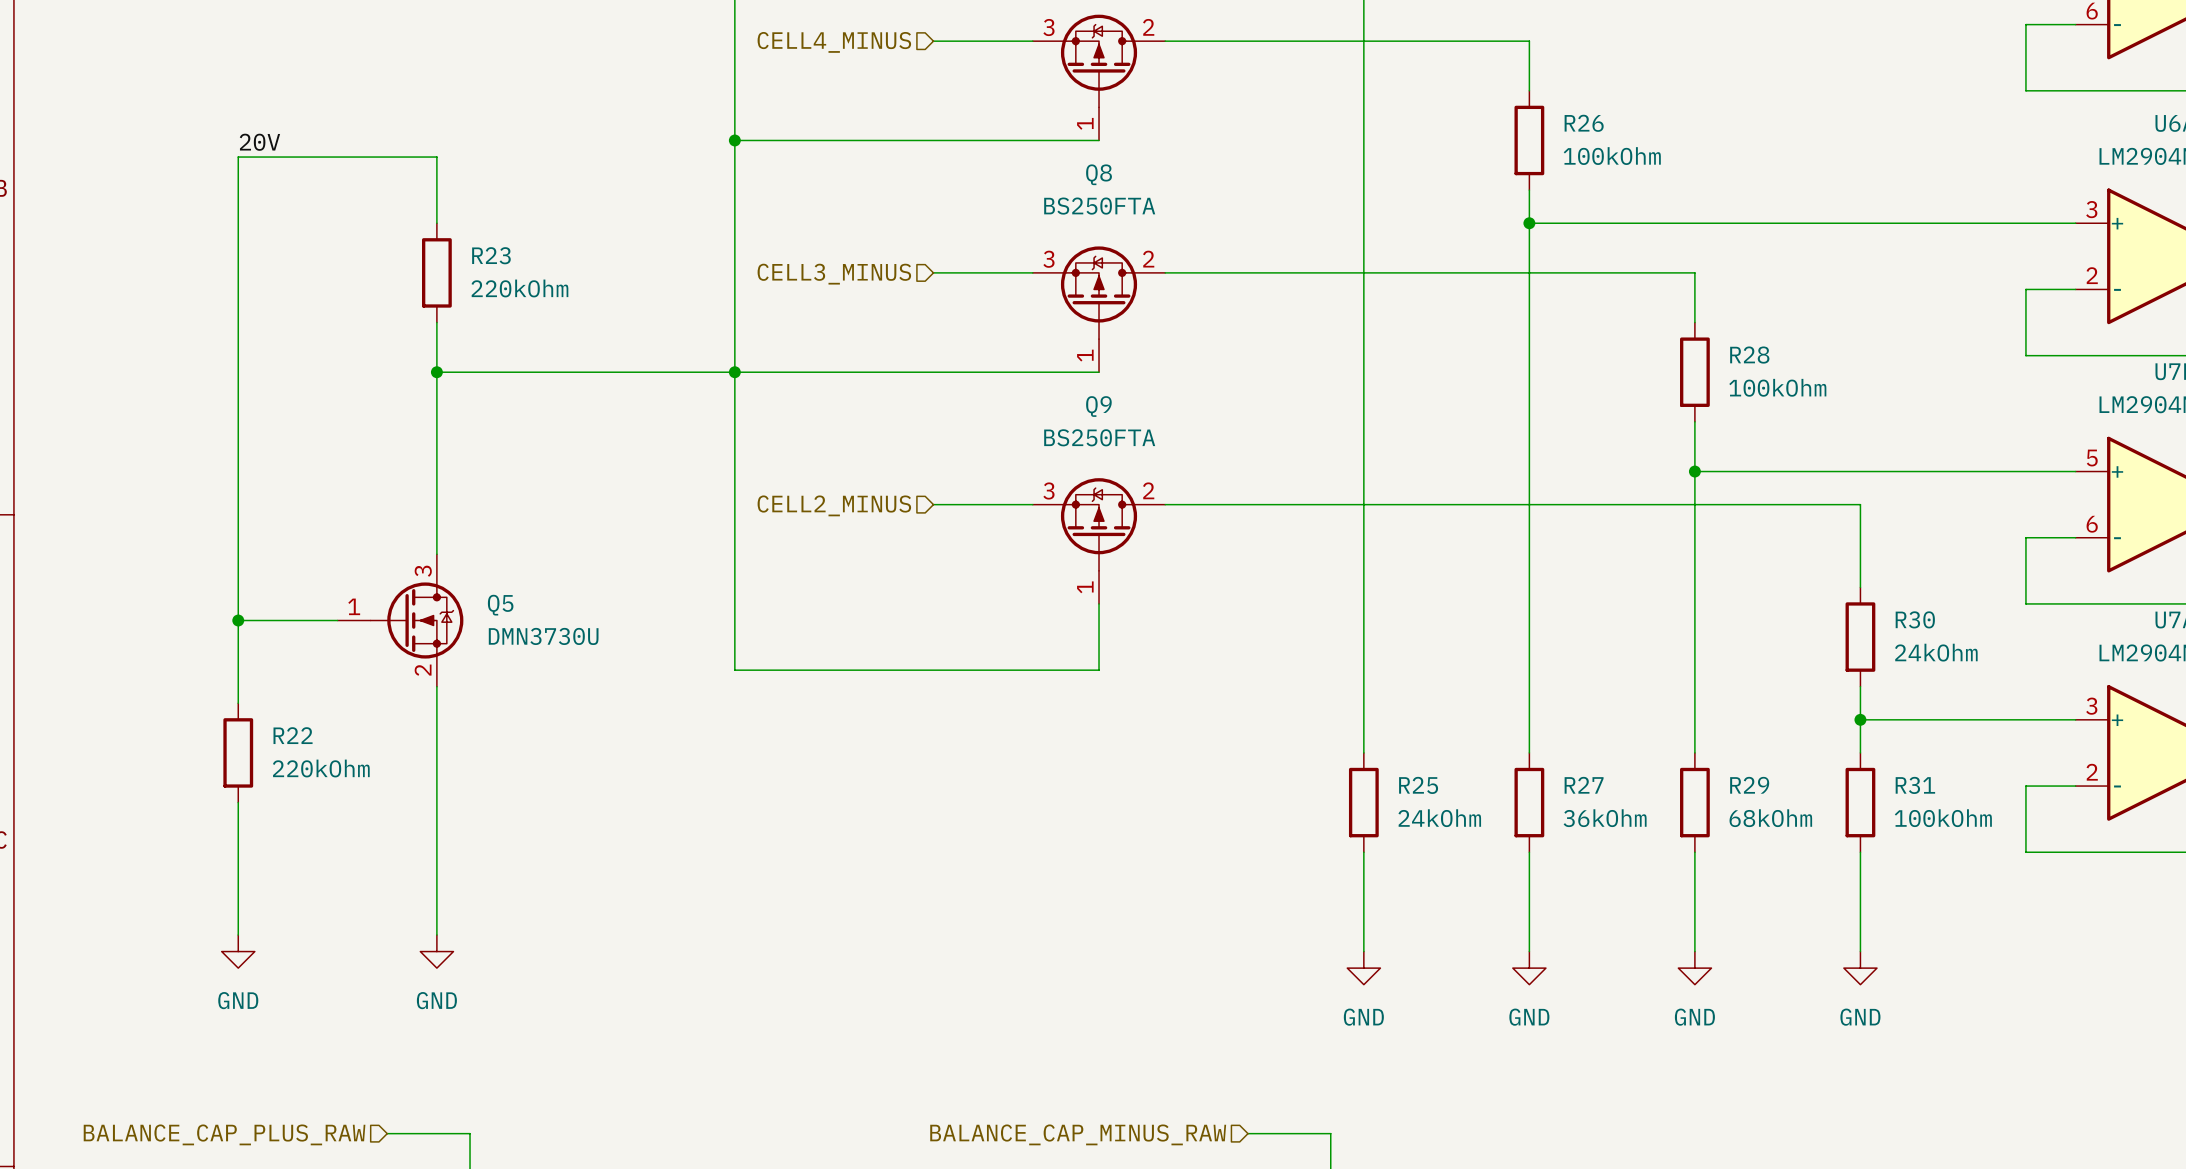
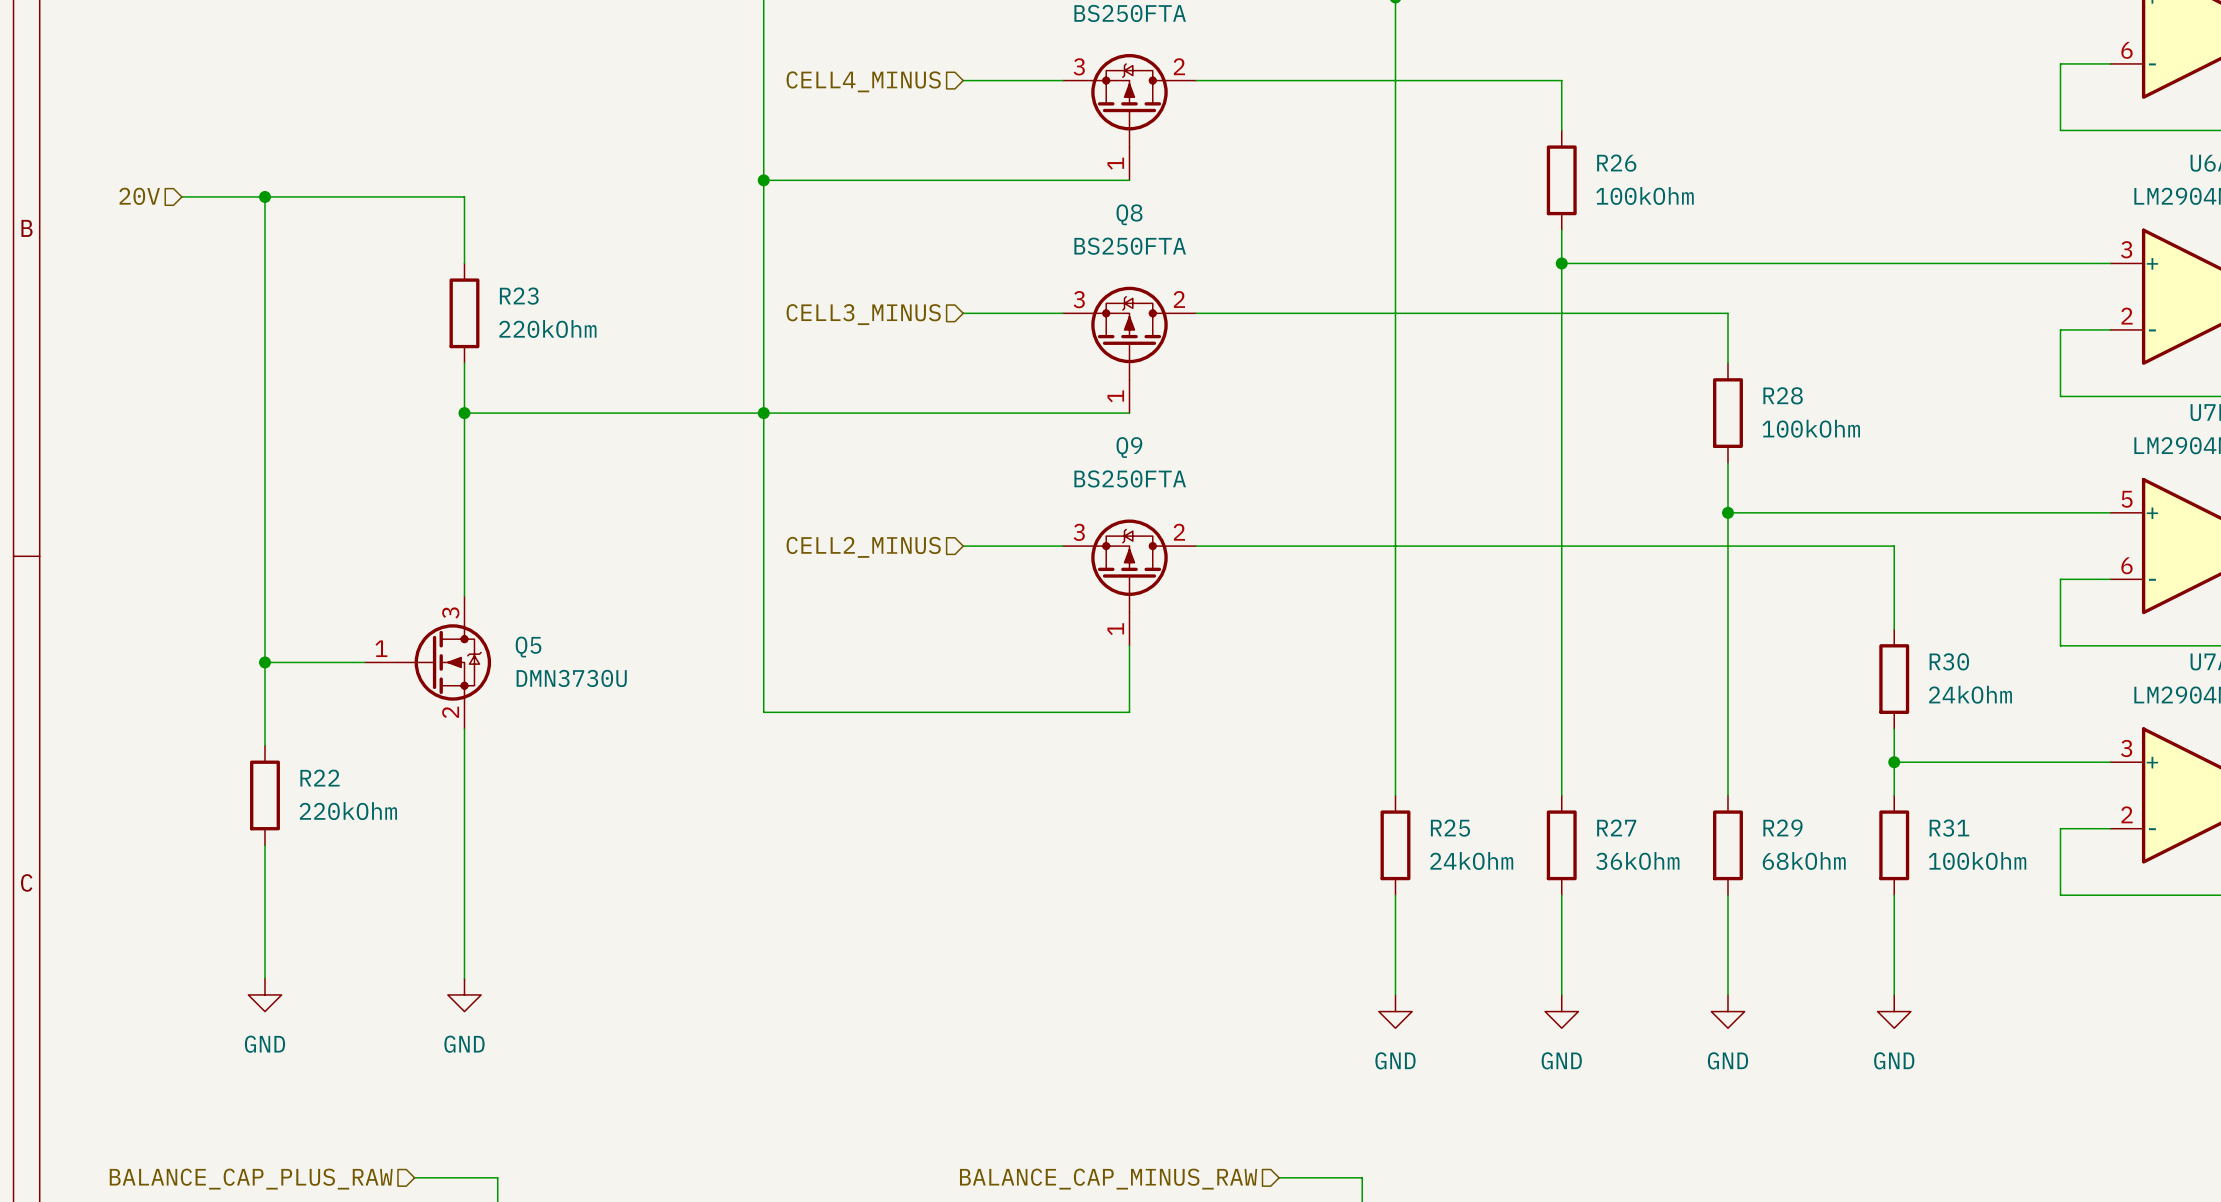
label: 20V (259, 142) -> none
hierarchical label: none -> 20V (139, 196)
wire: none -> (181, 196) (264, 196)
junction: none -> (264, 196)

